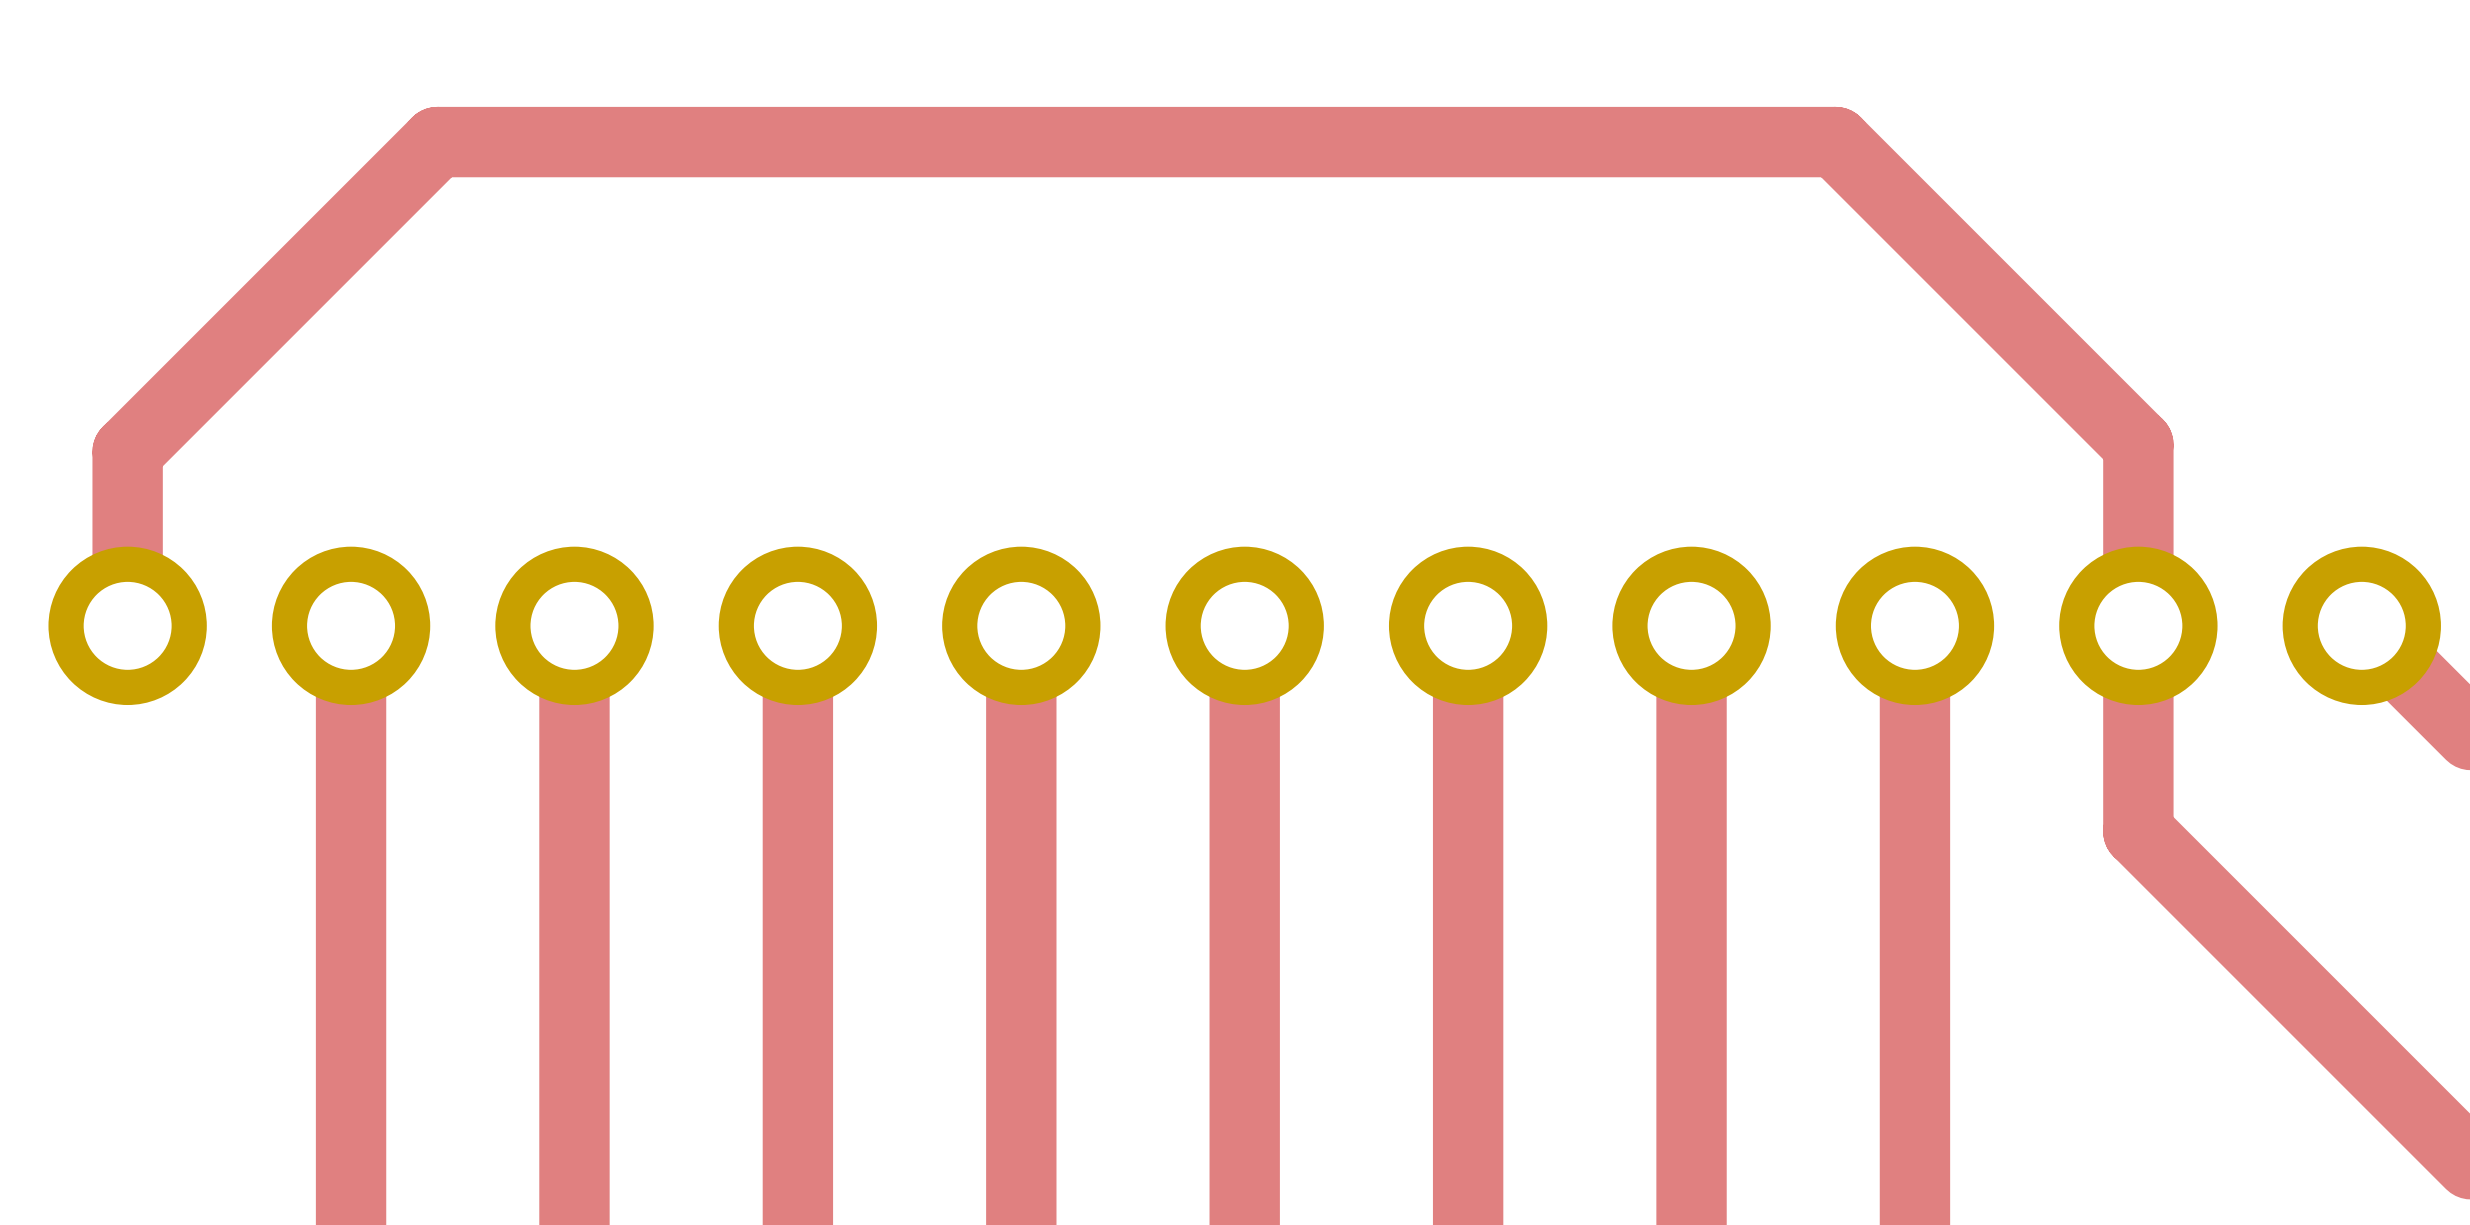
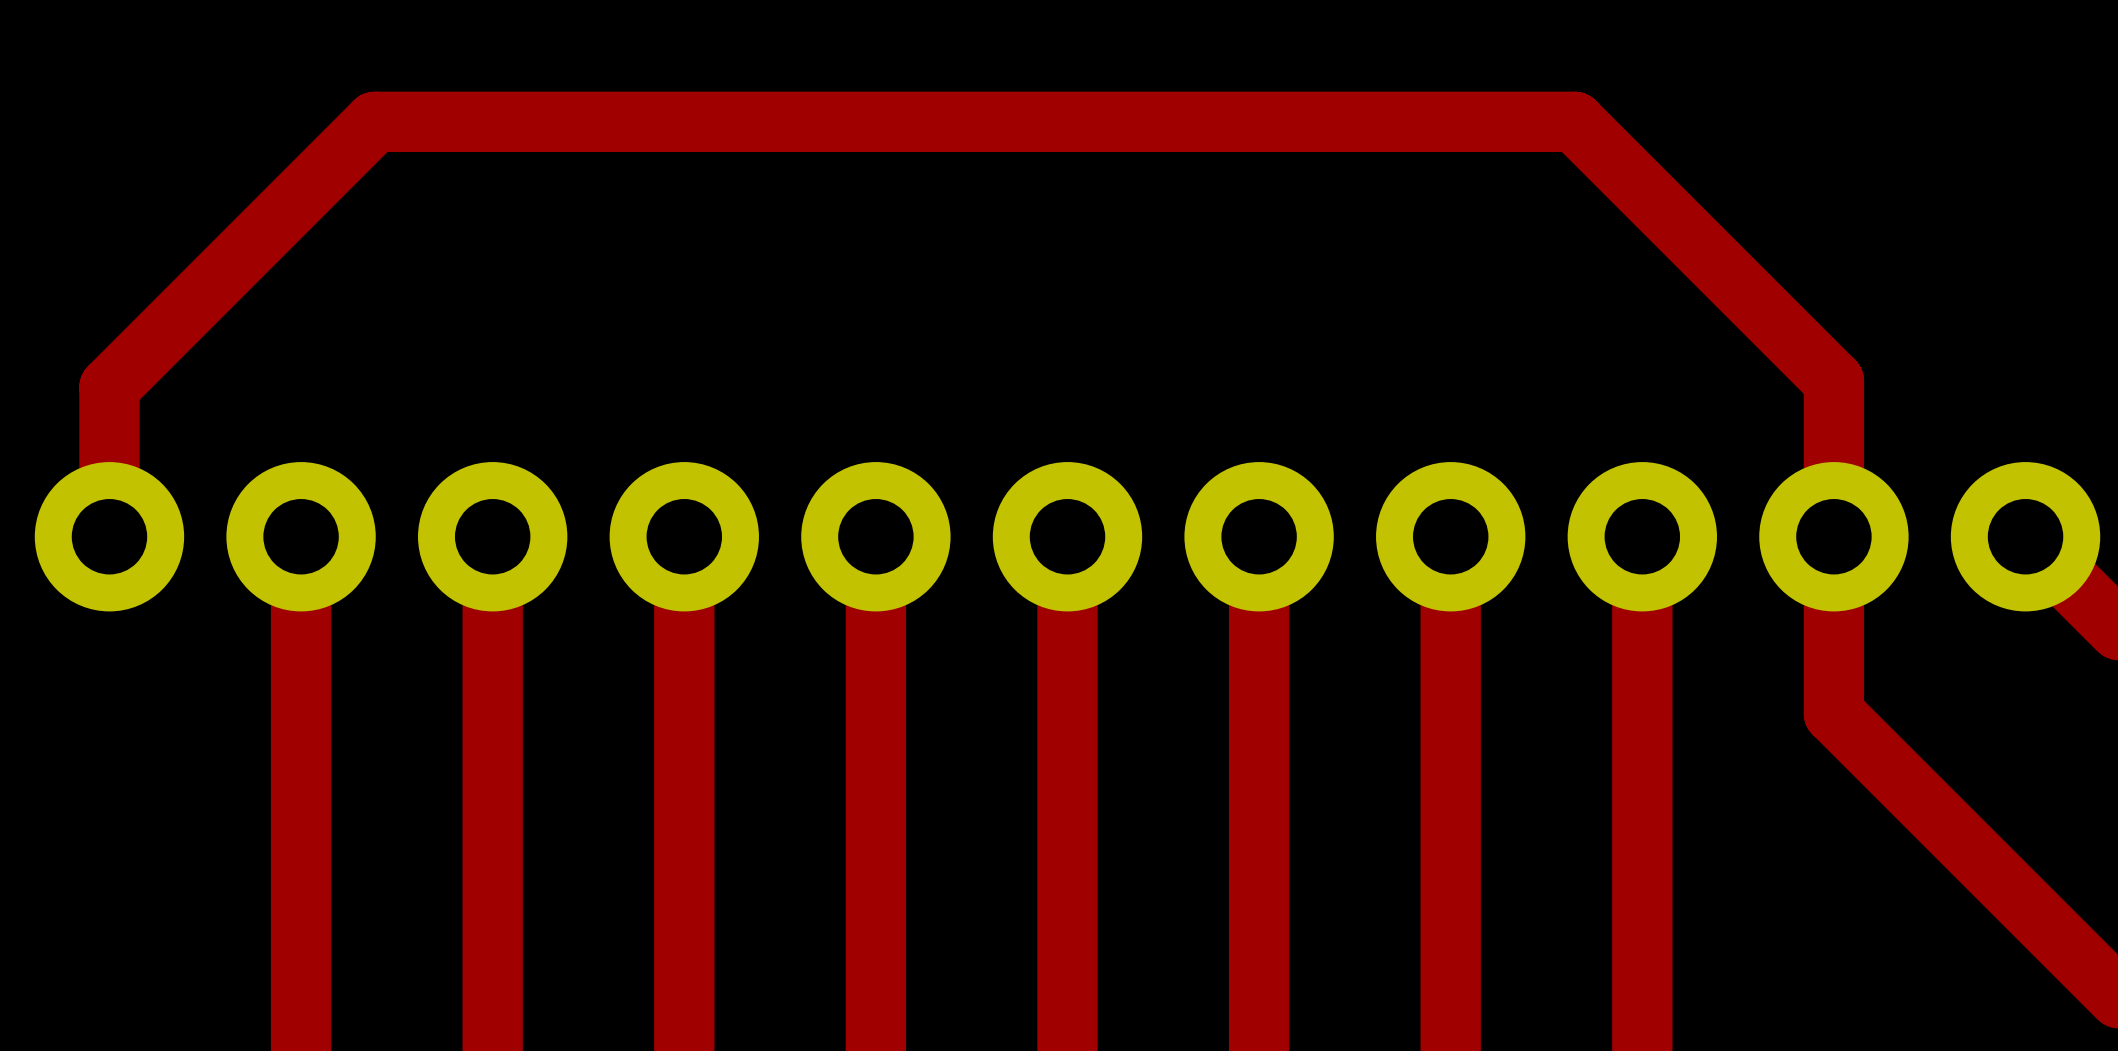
part footprint: [48, 546, 2441, 706] -> [34, 462, 2101, 612]

